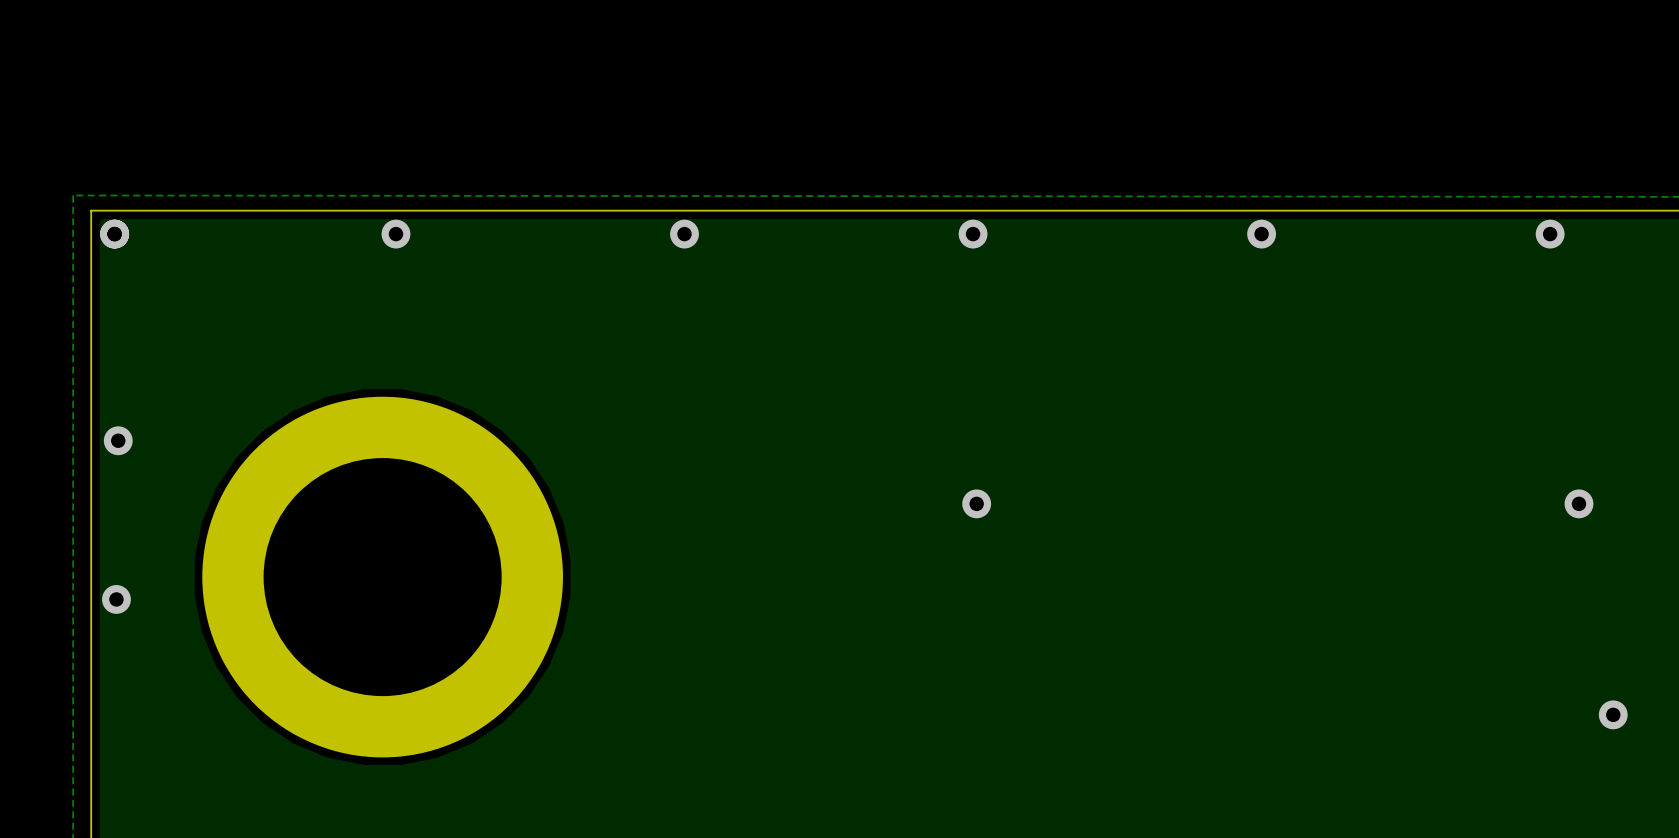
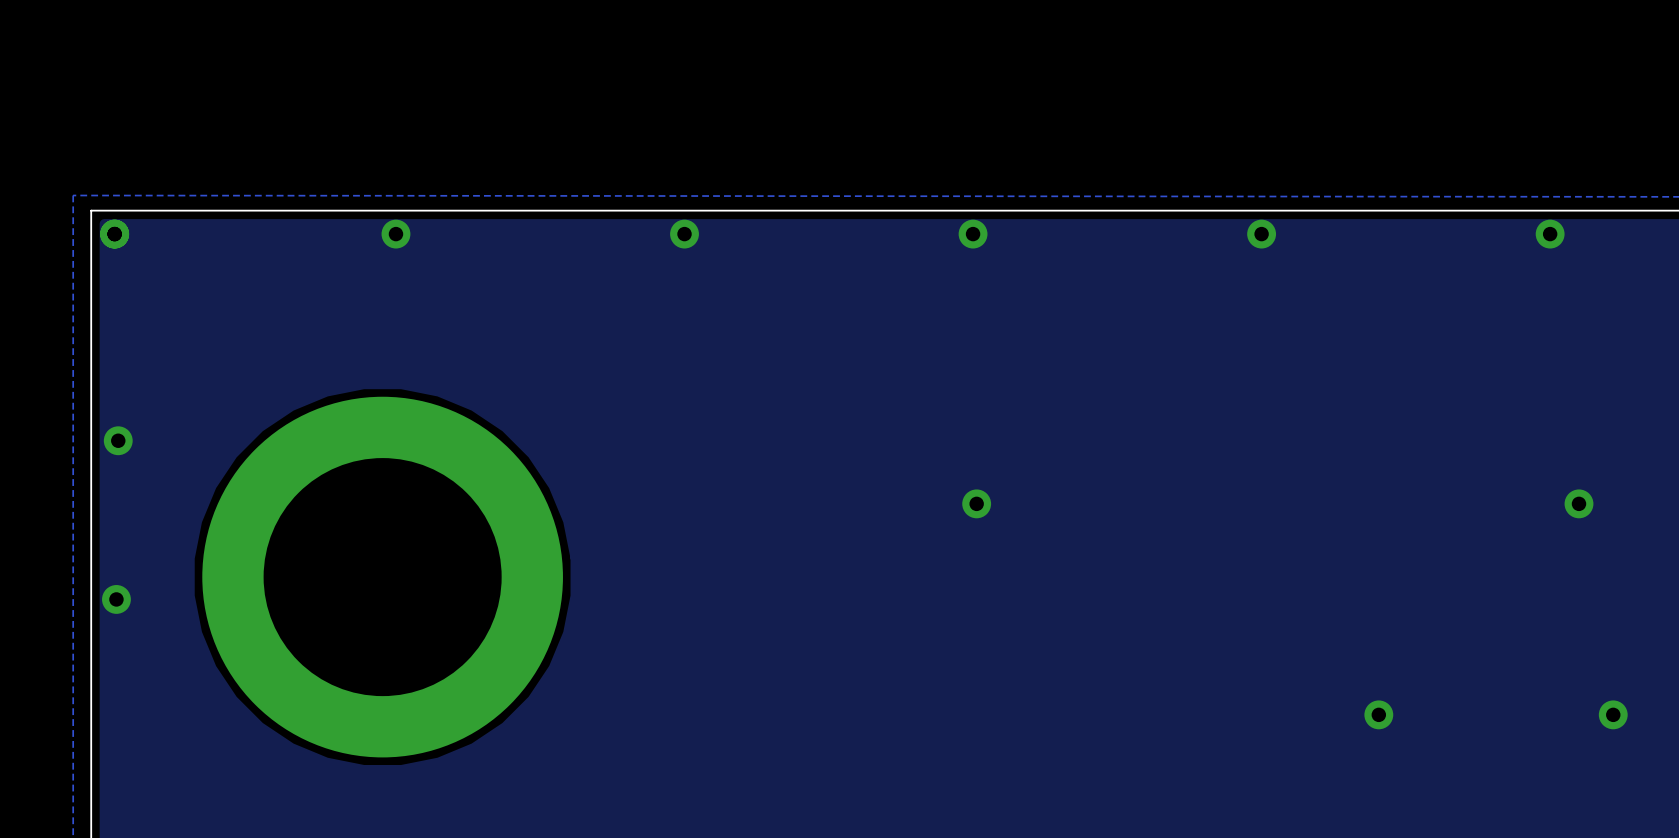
via: none -> (1378, 714)

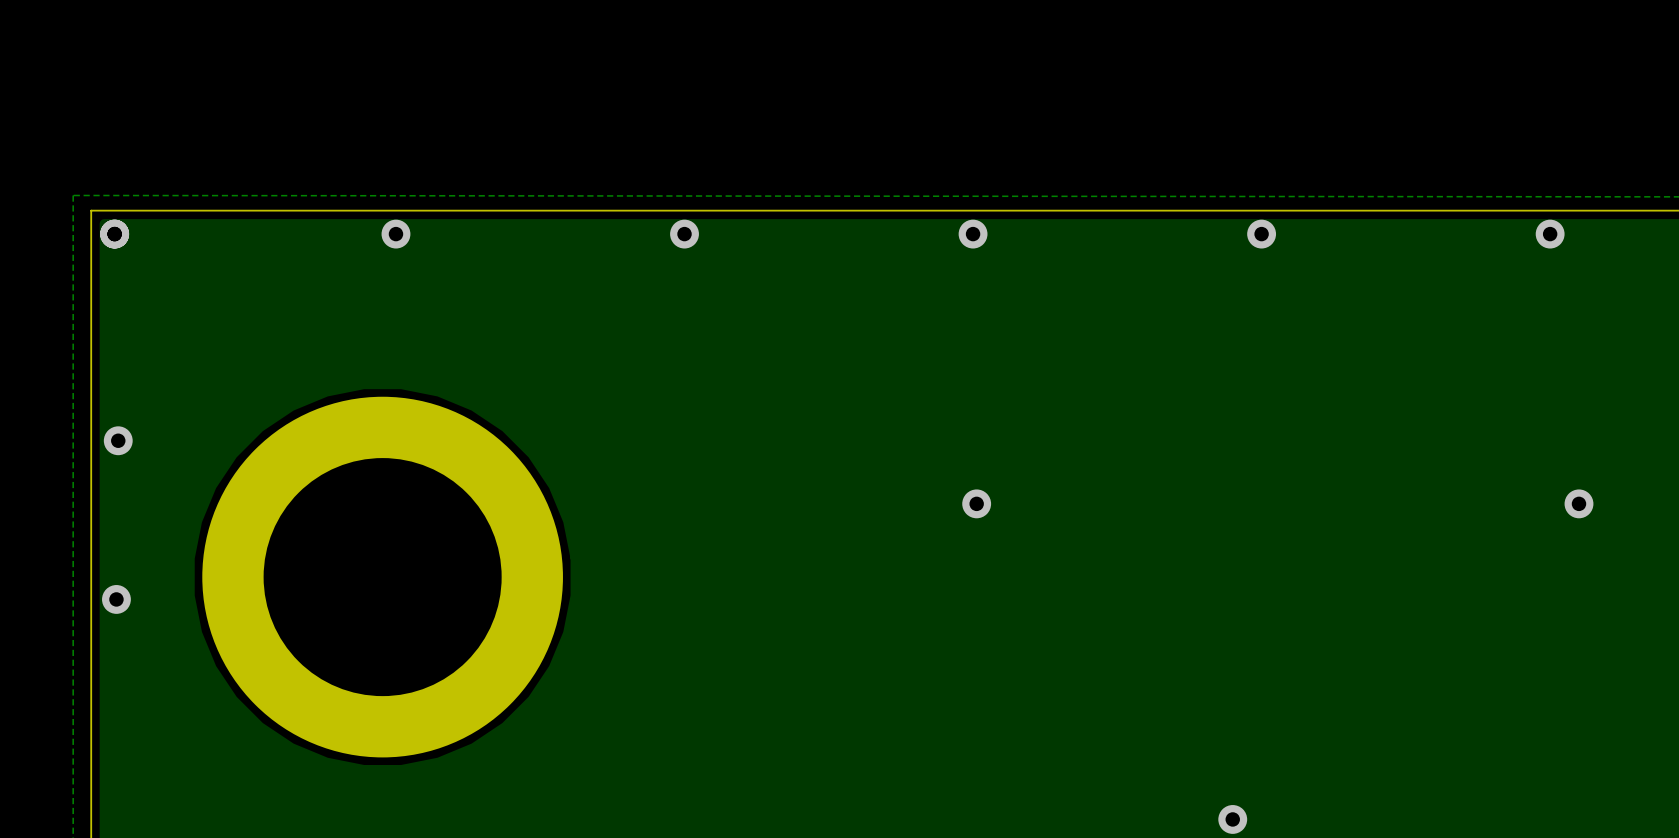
via: (1378, 714) -> none
via: (1613, 714) -> none
via: none -> (1232, 819)

